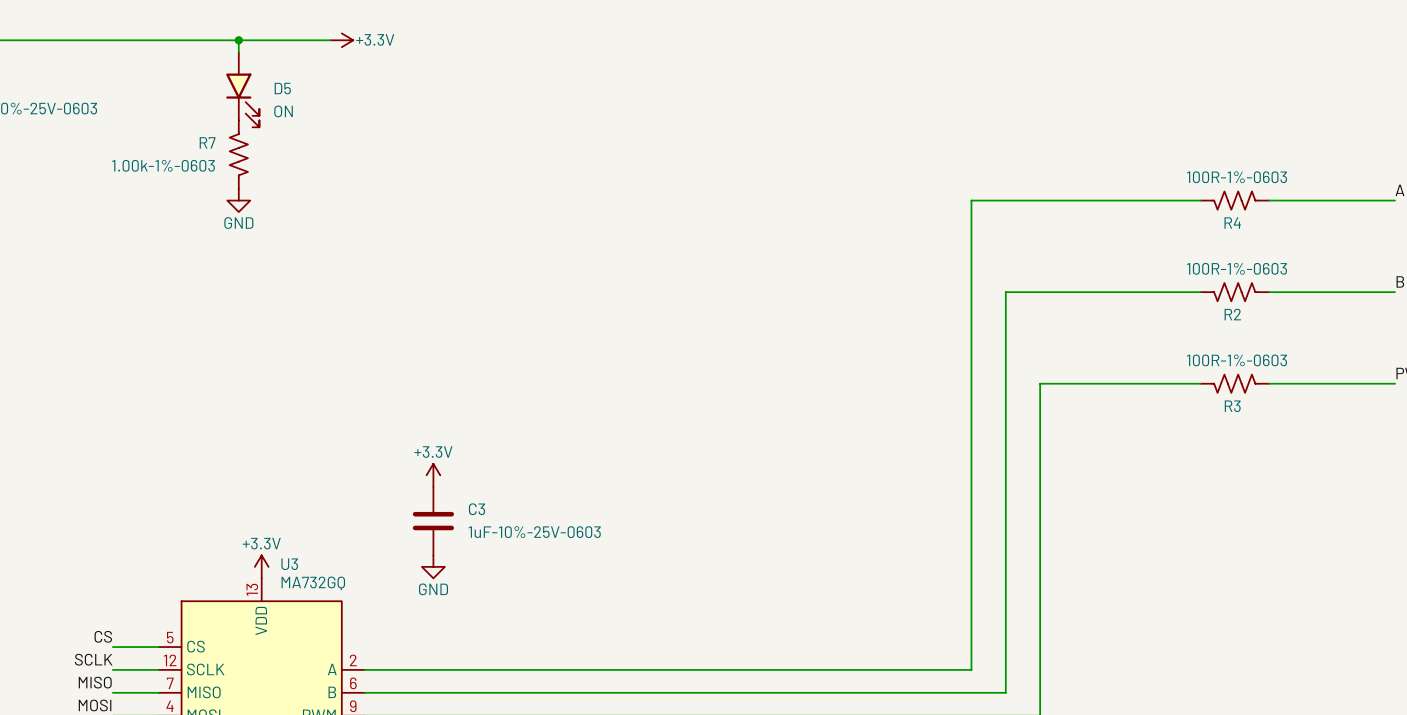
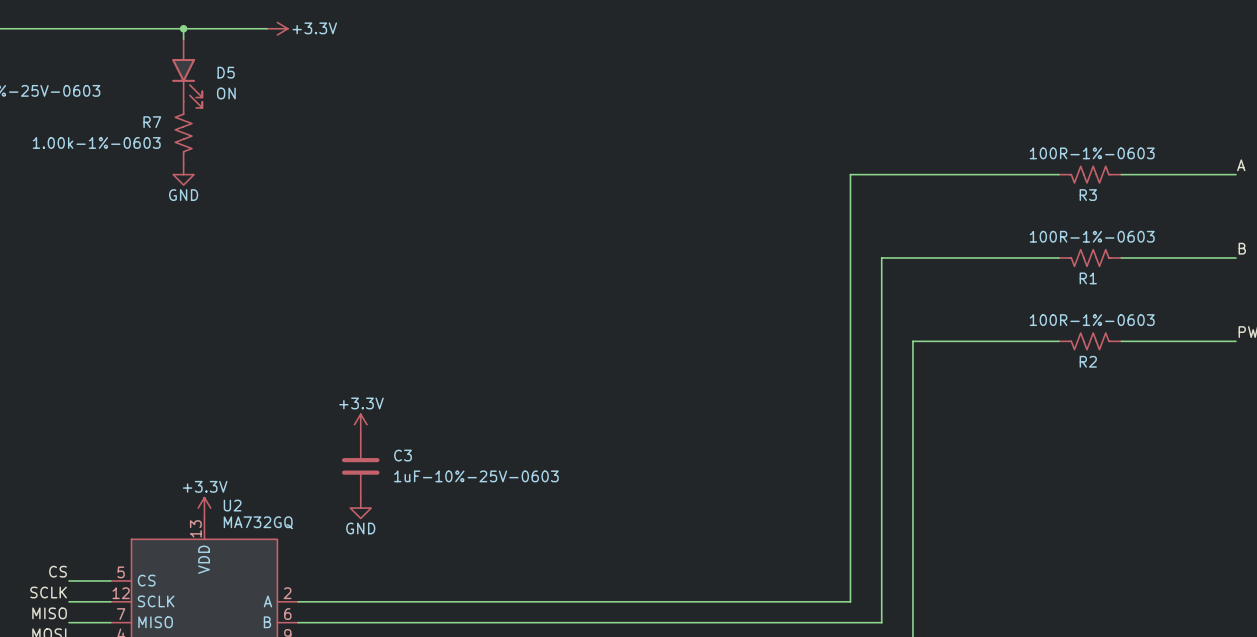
R4 name: R4 (1232, 223) -> R3 (1088, 195)
R2 name: R2 (1232, 314) -> R1 (1088, 278)
R3 name: R3 (1232, 406) -> R2 (1088, 361)
U3 name: U3 (289, 564) -> U2 (232, 505)

